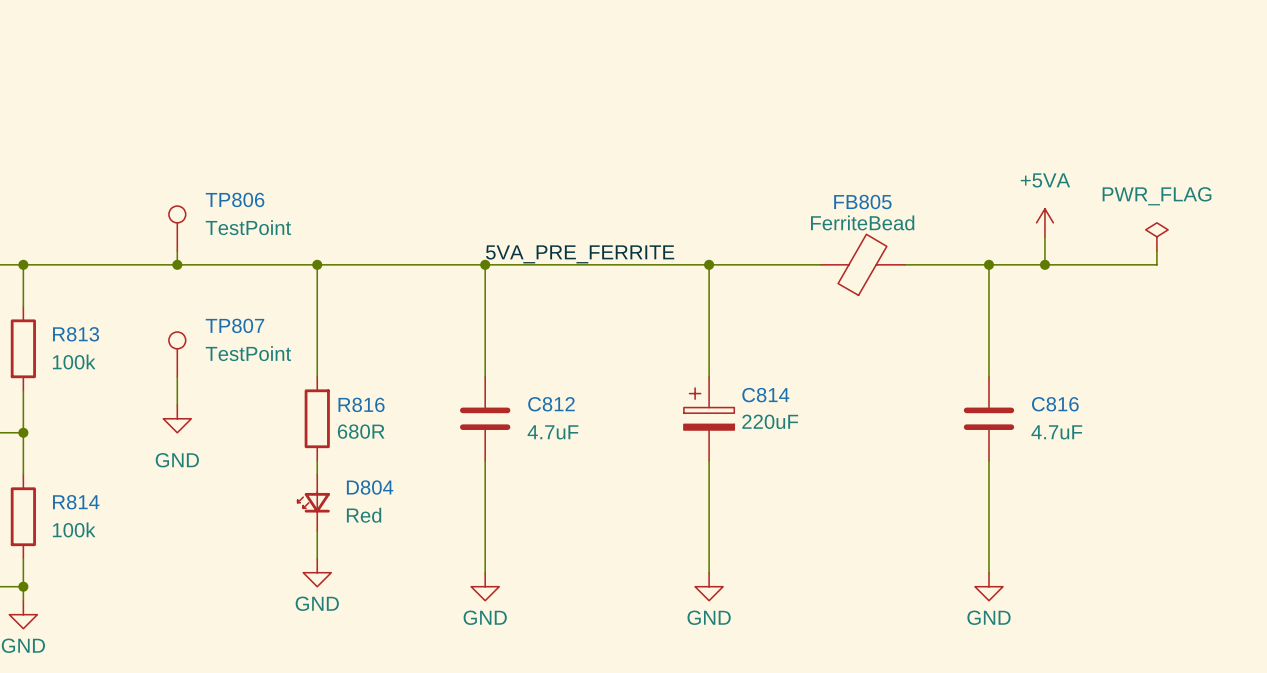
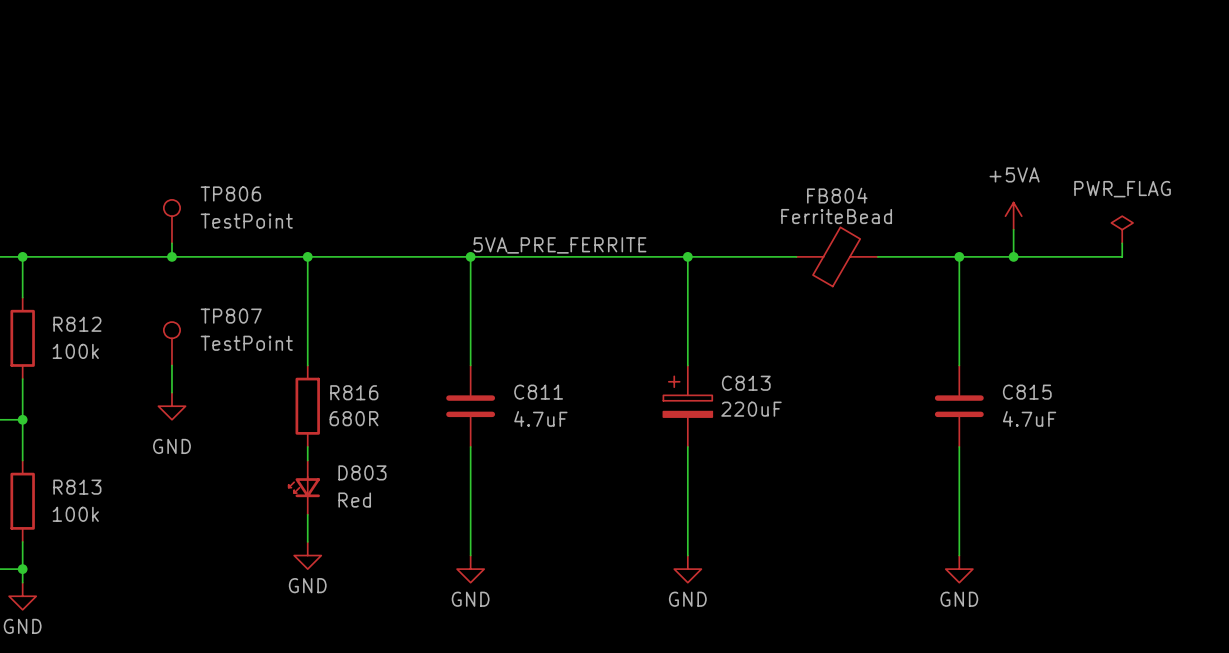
FB805 name: FB805 (862, 202) -> FB804 (837, 195)
R813 name: R813 (76, 334) -> R812 (77, 324)
C814 name: C814 (765, 395) -> C813 (746, 383)
C812 name: C812 (551, 404) -> C811 (538, 392)
C816 name: C816 (1055, 404) -> C815 (1027, 392)
D804 name: D804 (370, 487) -> D803 (362, 472)
R814 name: R814 (76, 502) -> R813 (77, 487)

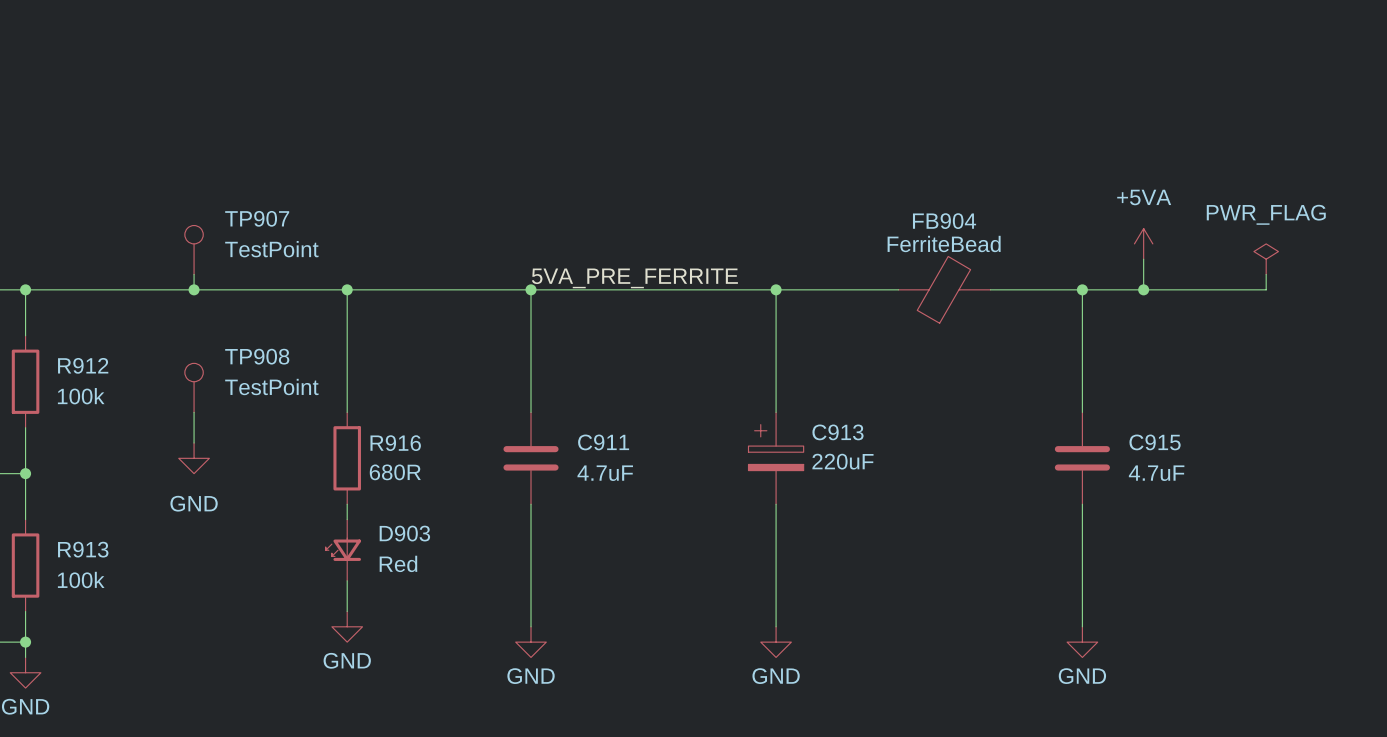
TP806 name: TP806 (230, 193) -> TP907 (257, 218)
FB804 name: FB804 (837, 195) -> FB904 (944, 221)
TP807 name: TP807 (231, 316) -> TP908 (257, 356)
R812 name: R812 (77, 324) -> R912 (83, 365)
C813 name: C813 (746, 383) -> C913 (837, 432)
R816 name: R816 (354, 392) -> R916 (395, 443)
C811 name: C811 (538, 392) -> C911 (603, 442)
C815 name: C815 (1027, 392) -> C915 (1155, 442)
D803 name: D803 (362, 472) -> D903 (404, 533)
R813 name: R813 (77, 487) -> R913 (83, 549)

